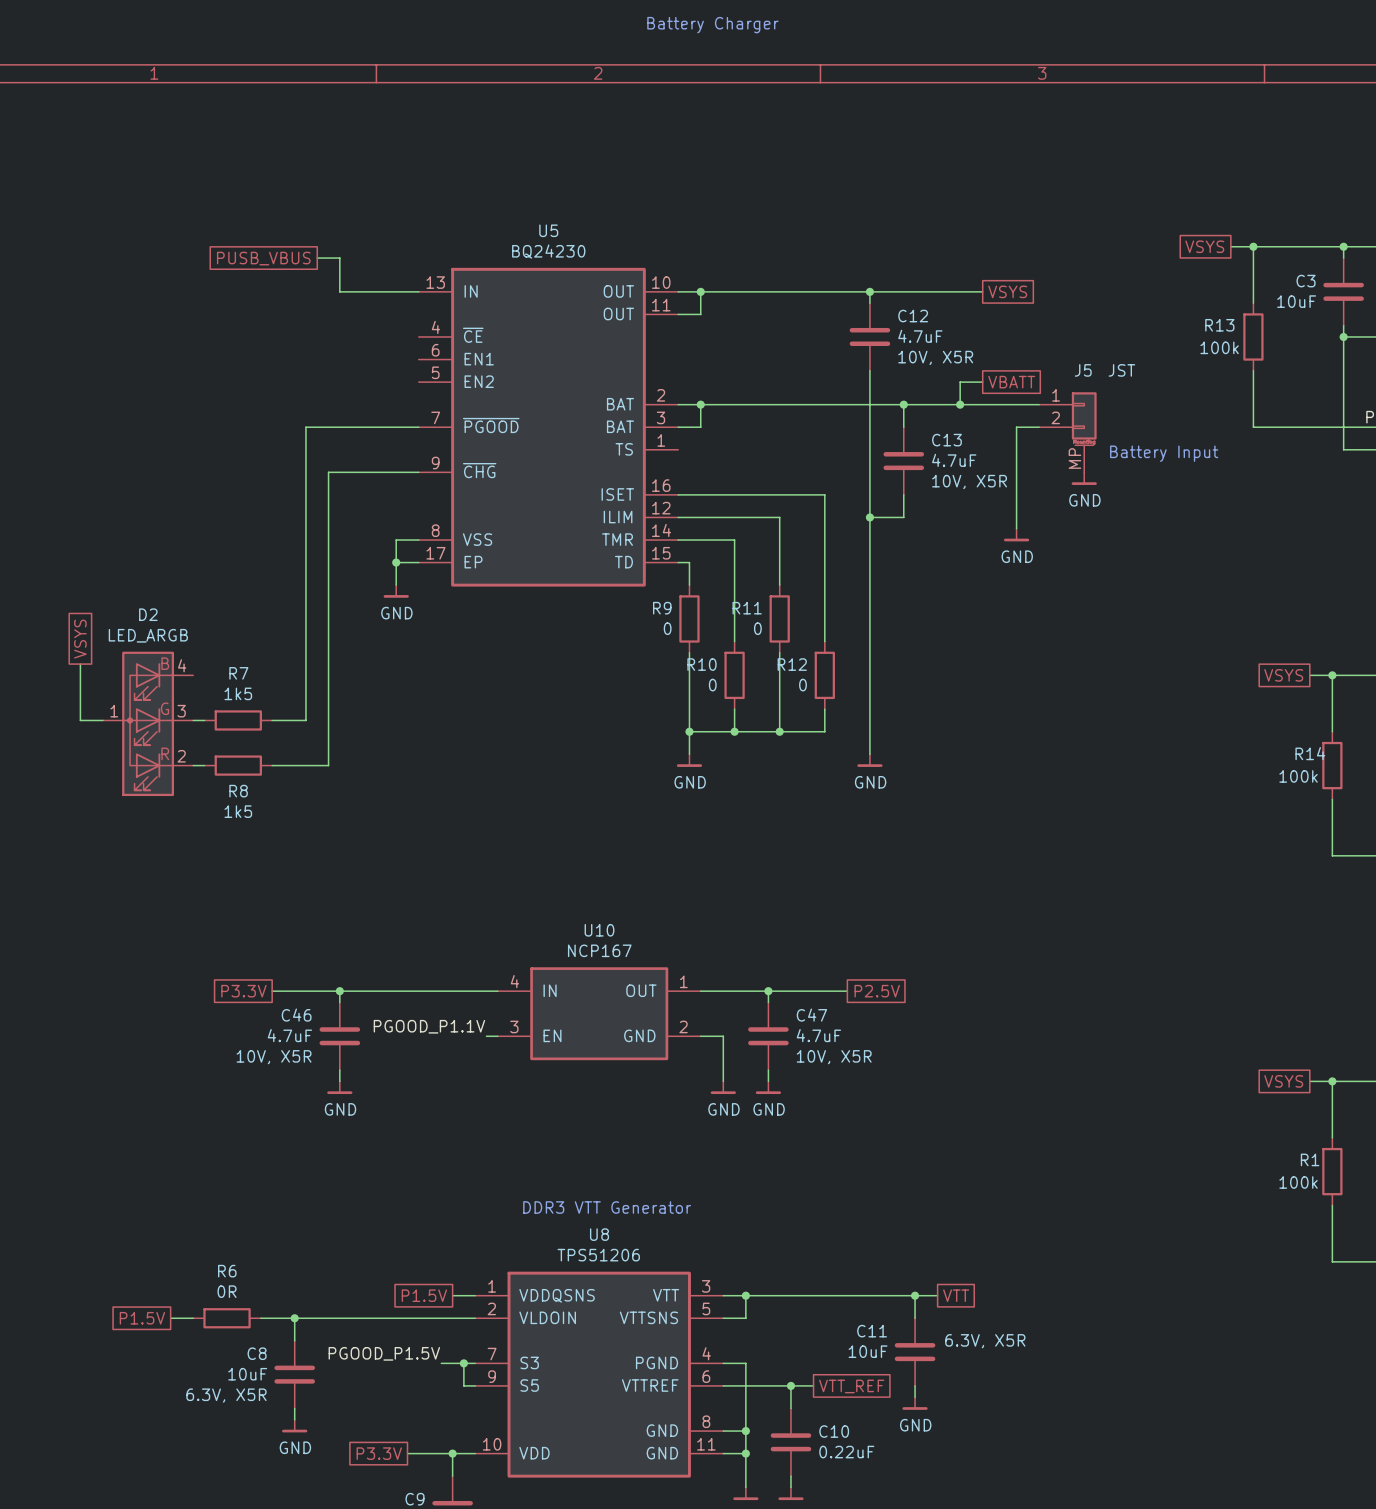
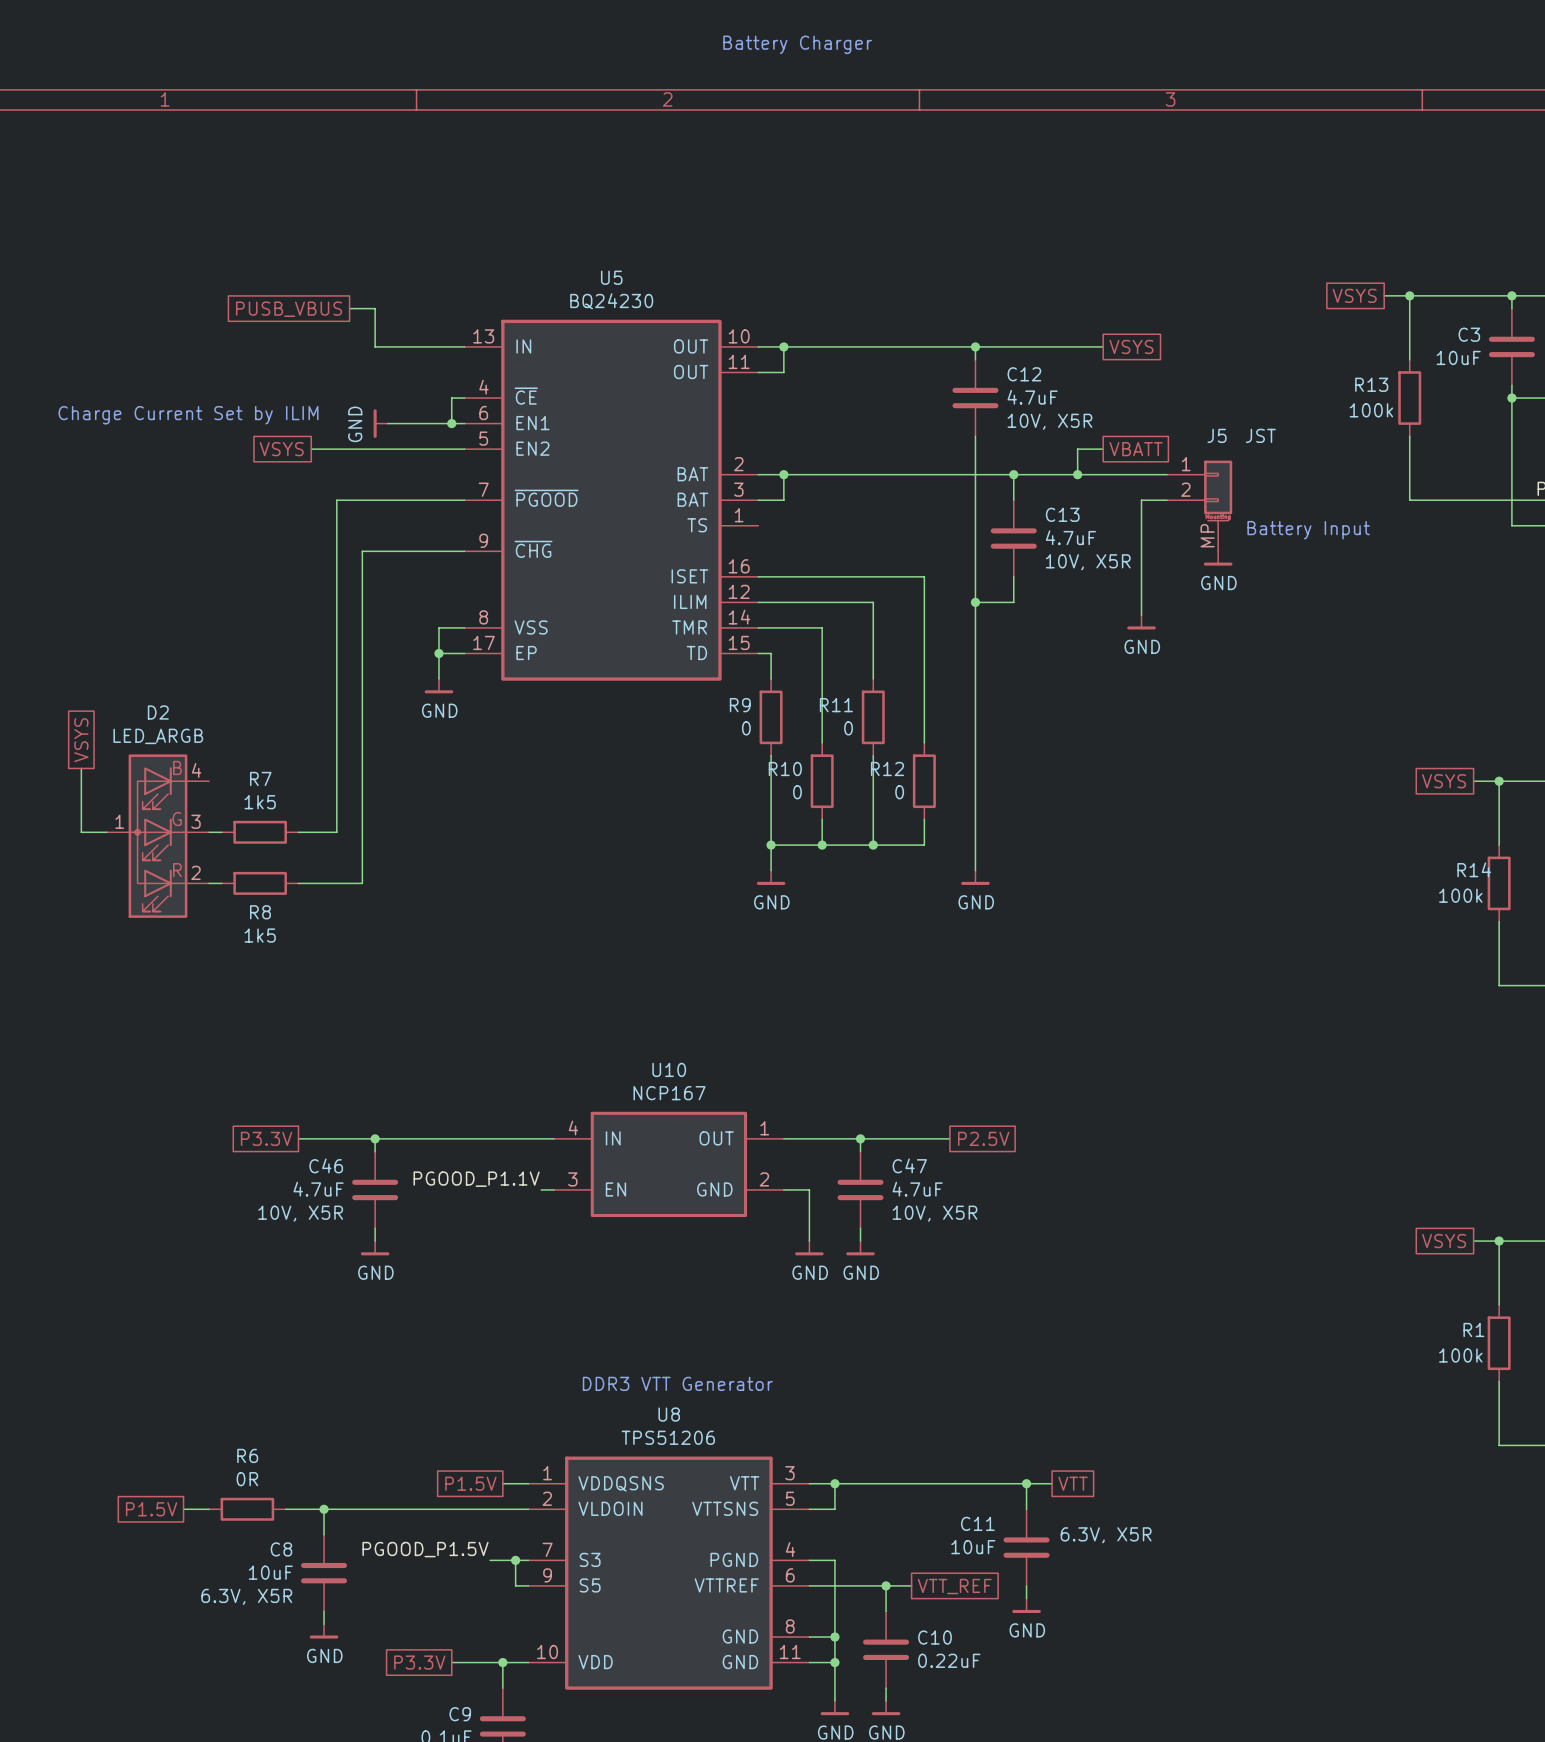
wire: none -> (464, 398) (451, 398) (451, 423)
text: none -> Charge Current Set by ILIM (188, 415)
power symbol: none -> GND (380, 423)
wire: none -> (387, 423) (464, 423)
junction: none -> (451, 423)
global label: none -> VSYS (281, 449)
wire: none -> (311, 449) (464, 449)

